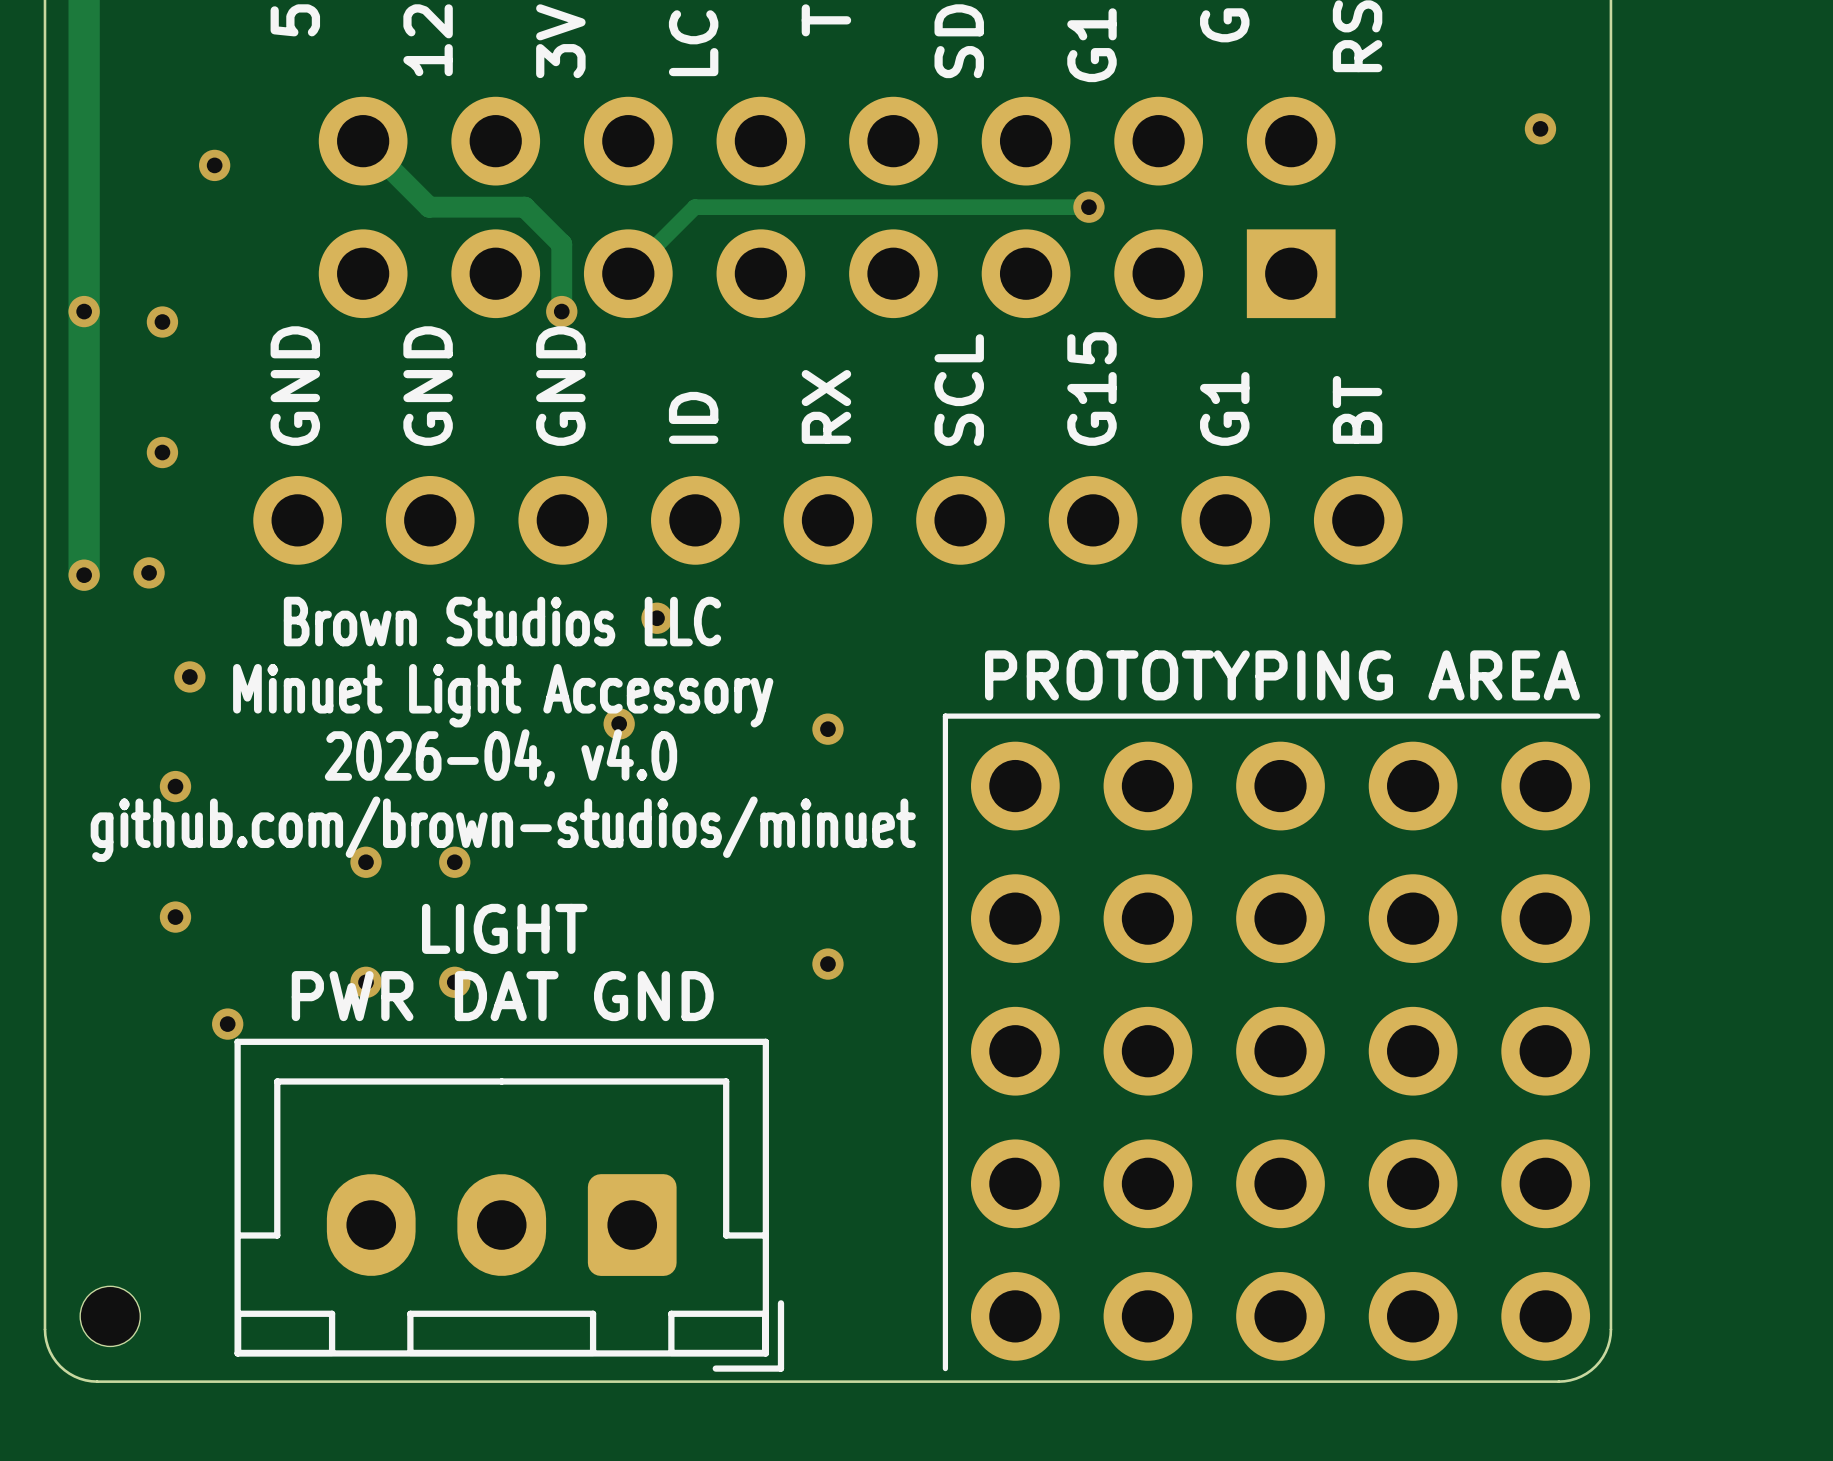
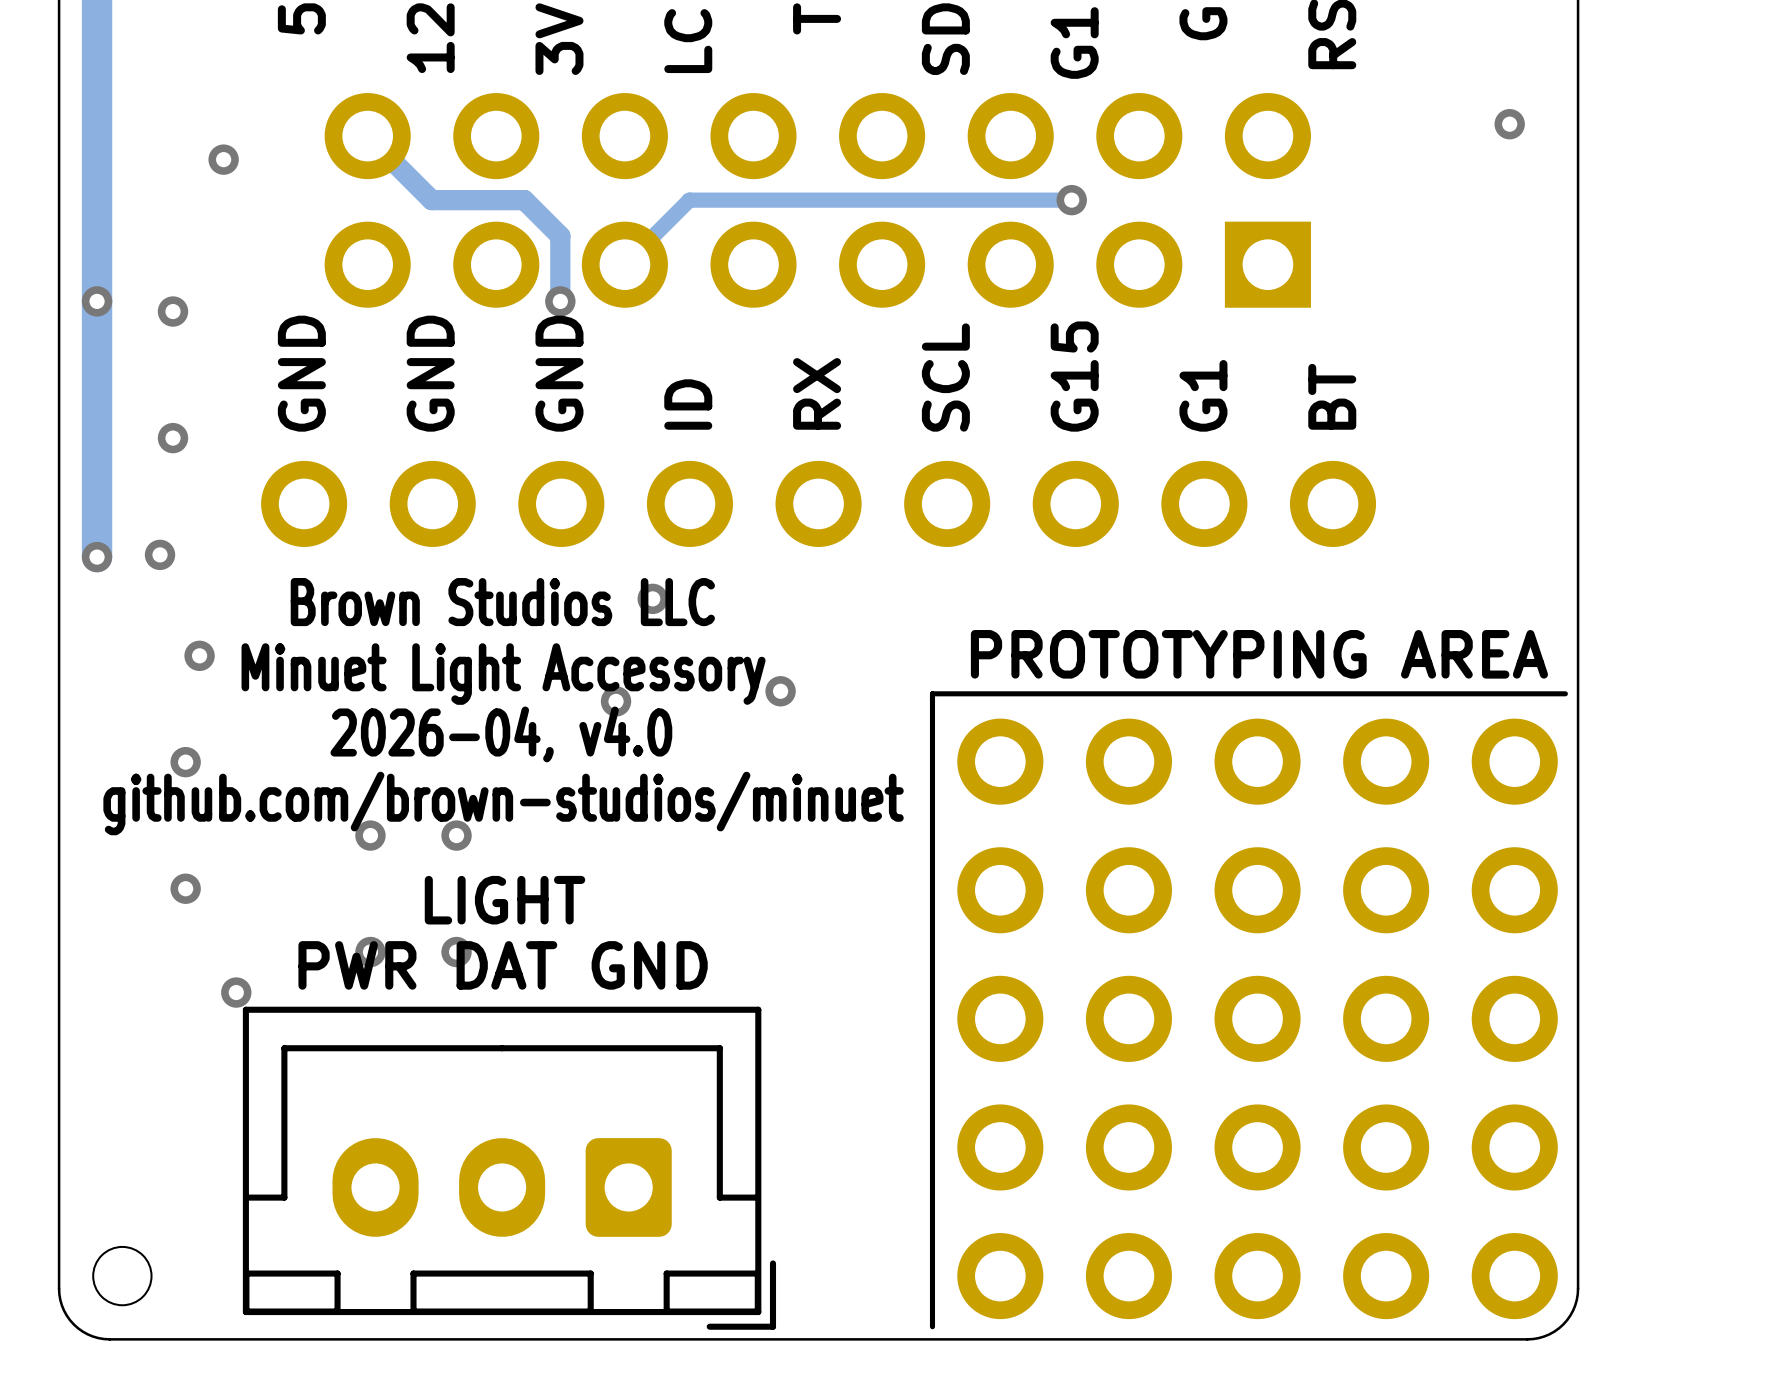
via position: (827, 729) -> (780, 691)
via: (827, 964) -> none

